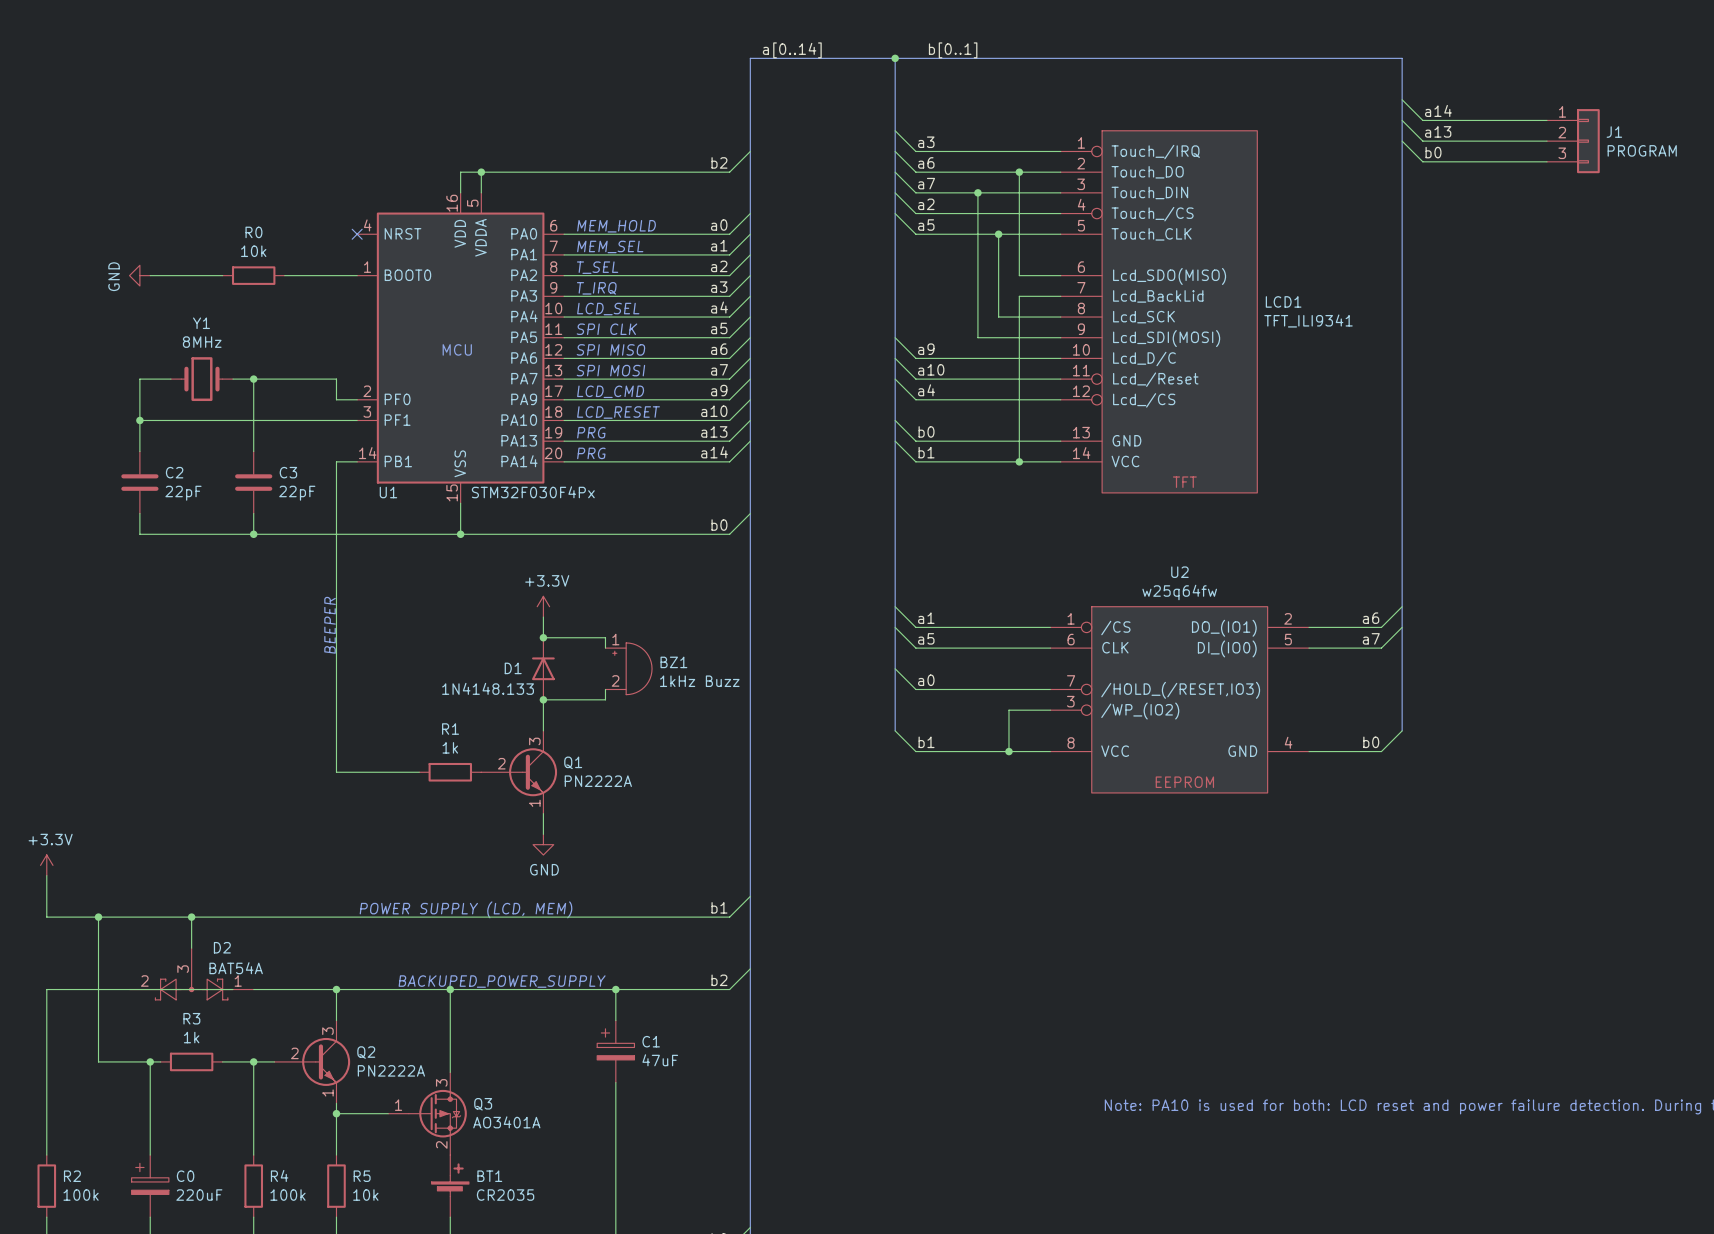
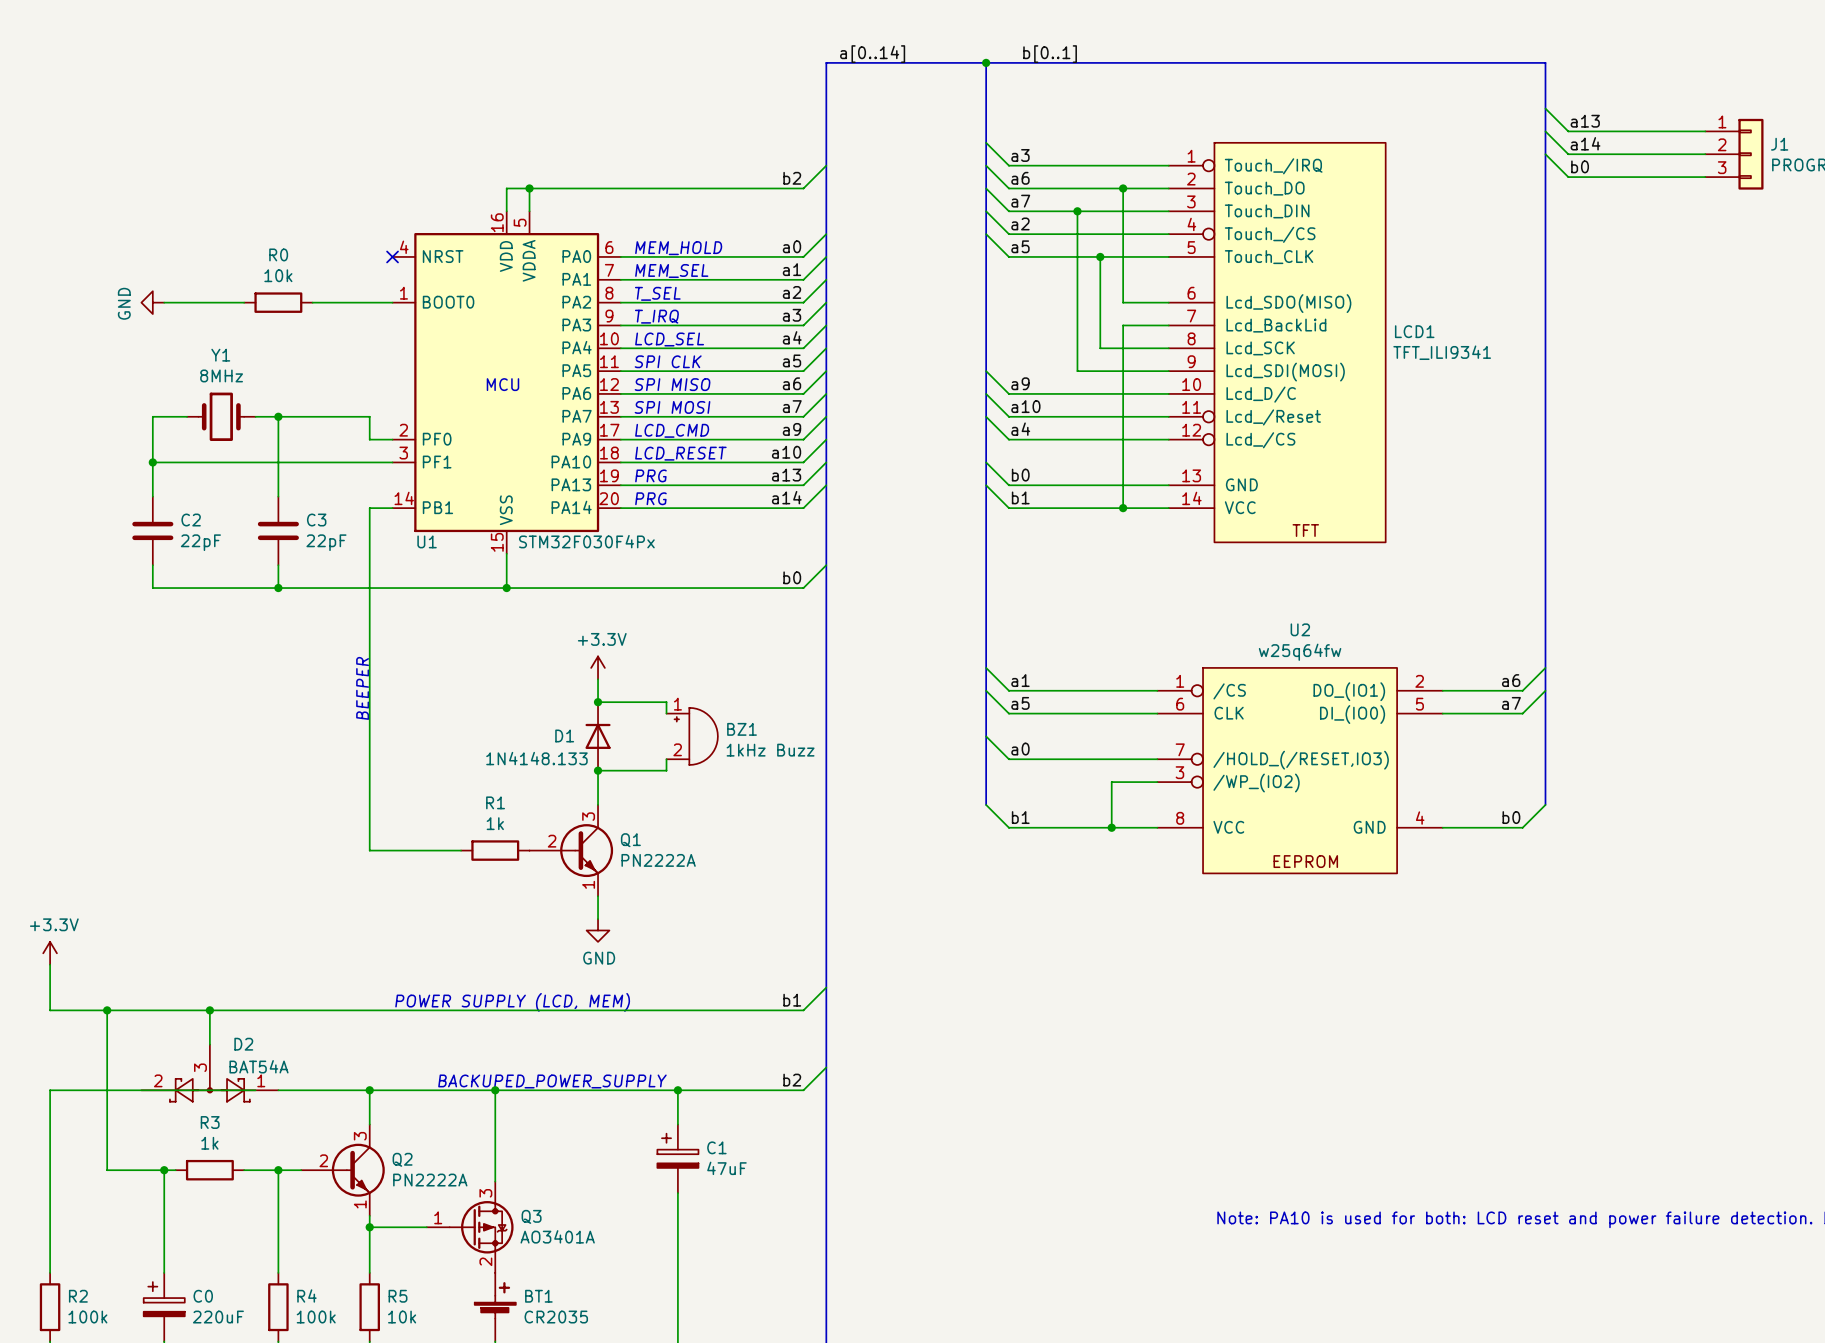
label: a14 (1438, 110) -> a13 (1585, 121)
label: a13 (1438, 131) -> a14 (1585, 143)

